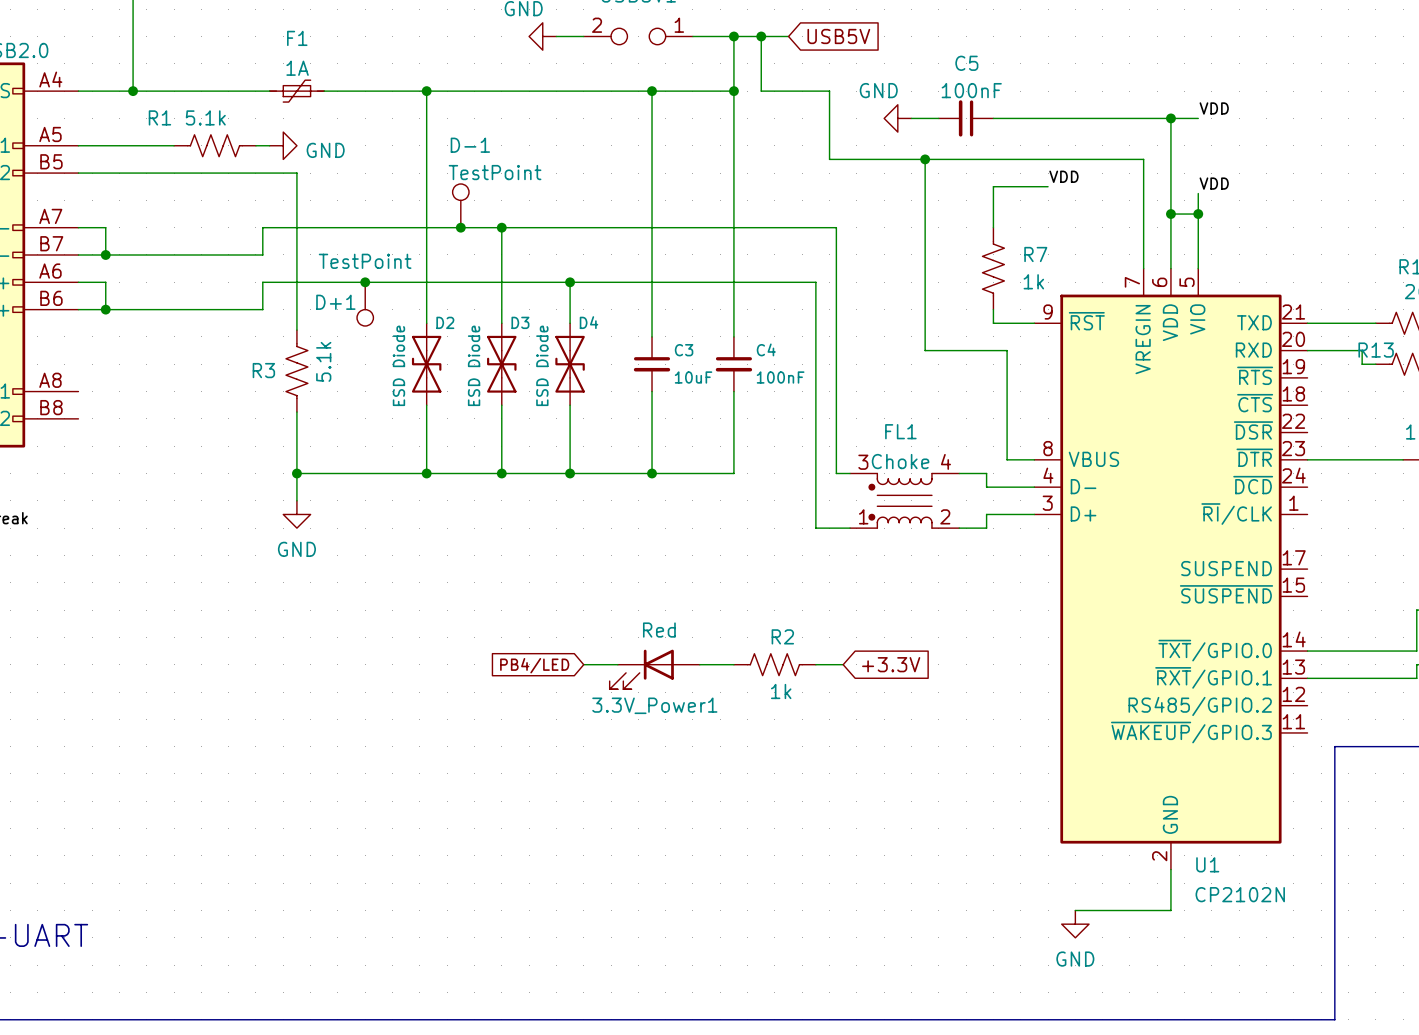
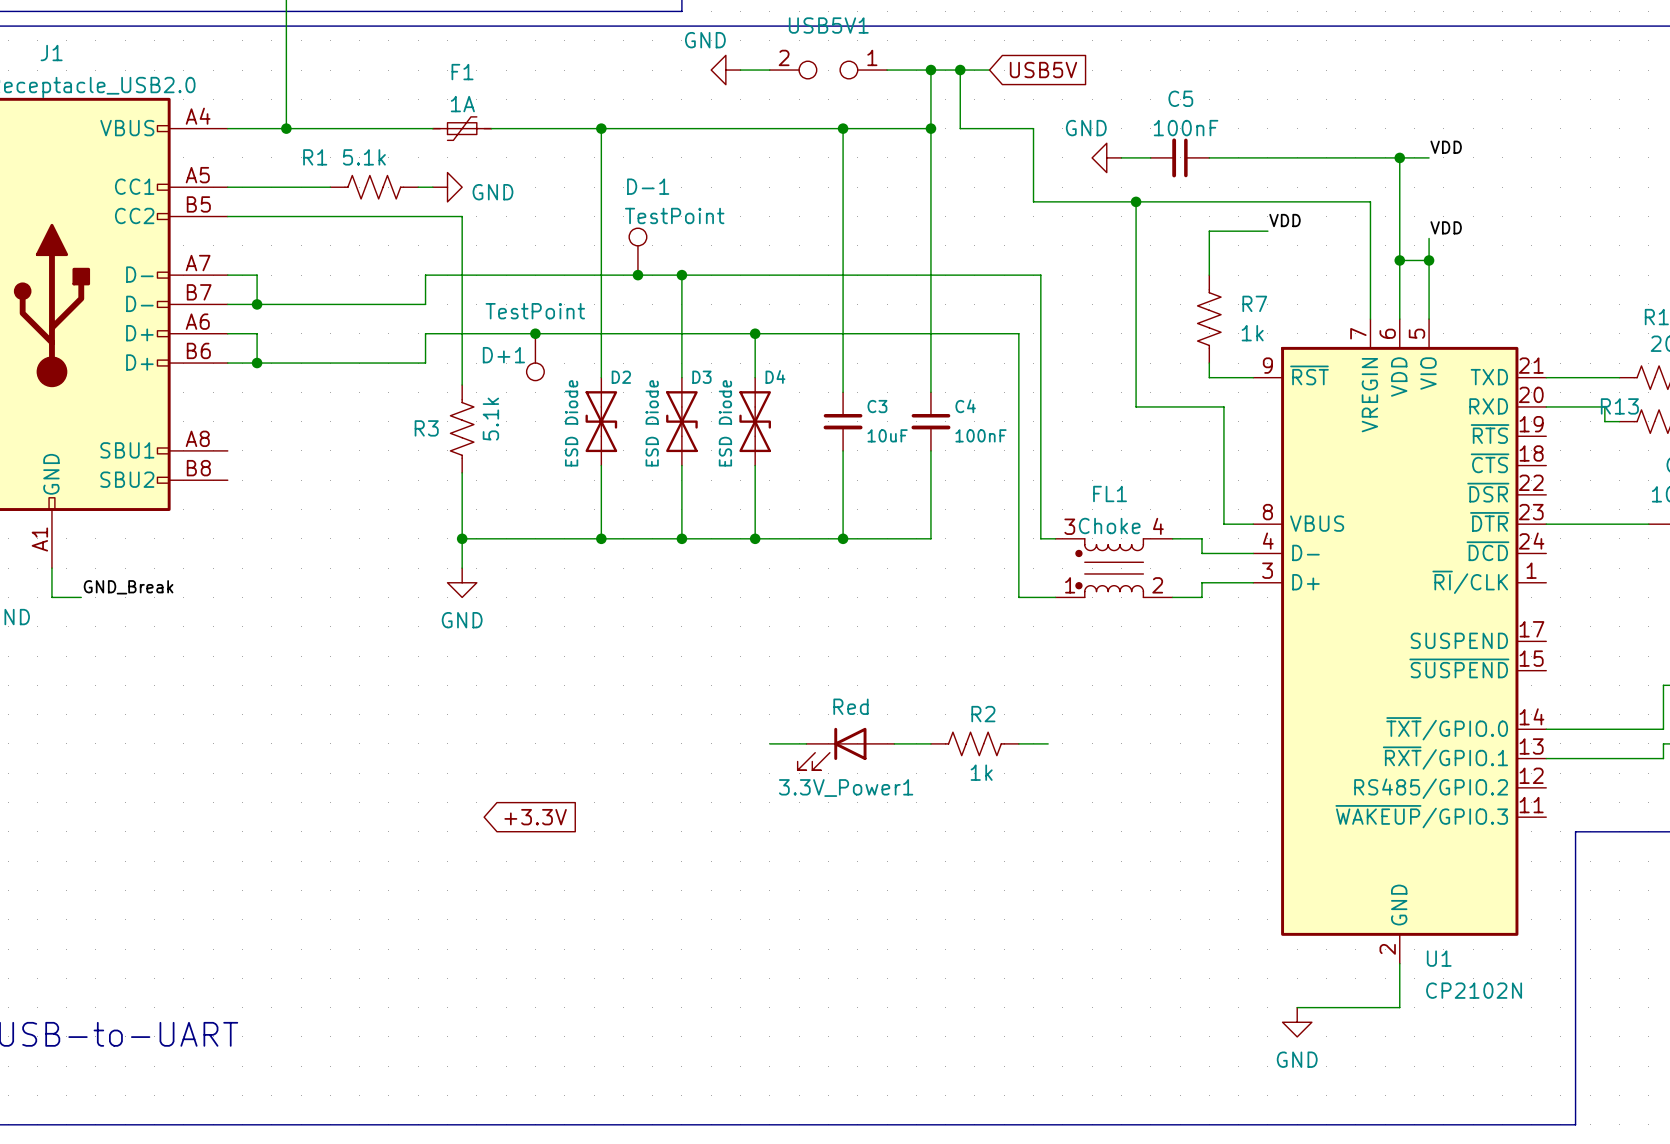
global label: +3.3V (891, 664) -> none
global label: PB4/LED (534, 665) -> none
global label: none -> +3.3V (535, 817)

